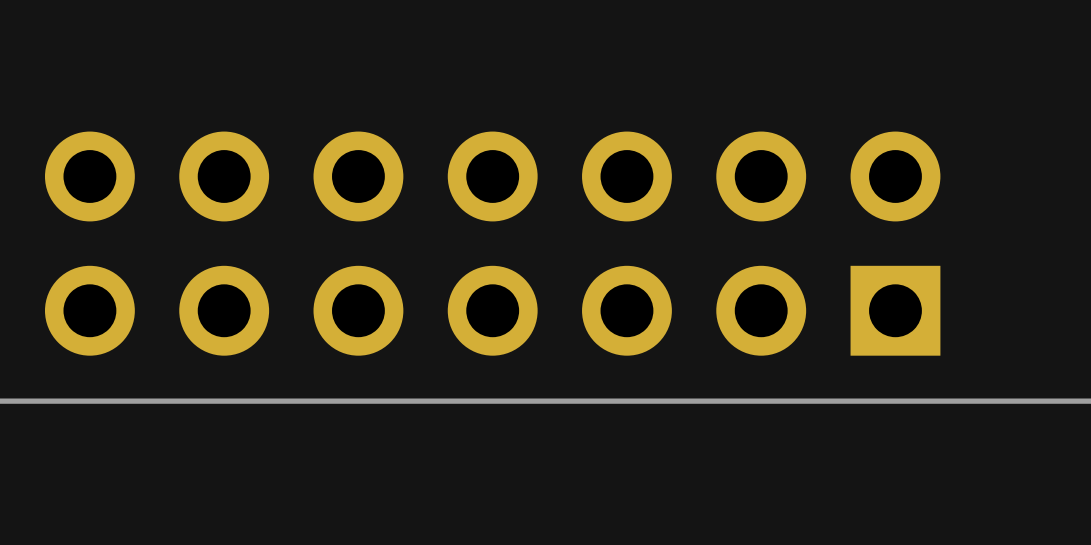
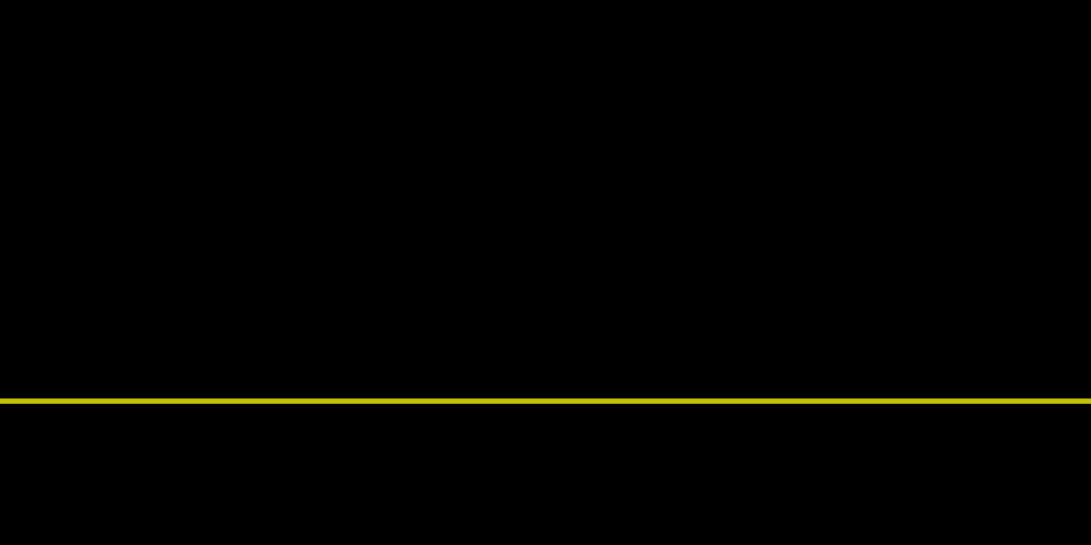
part: (492, 243) -> none

